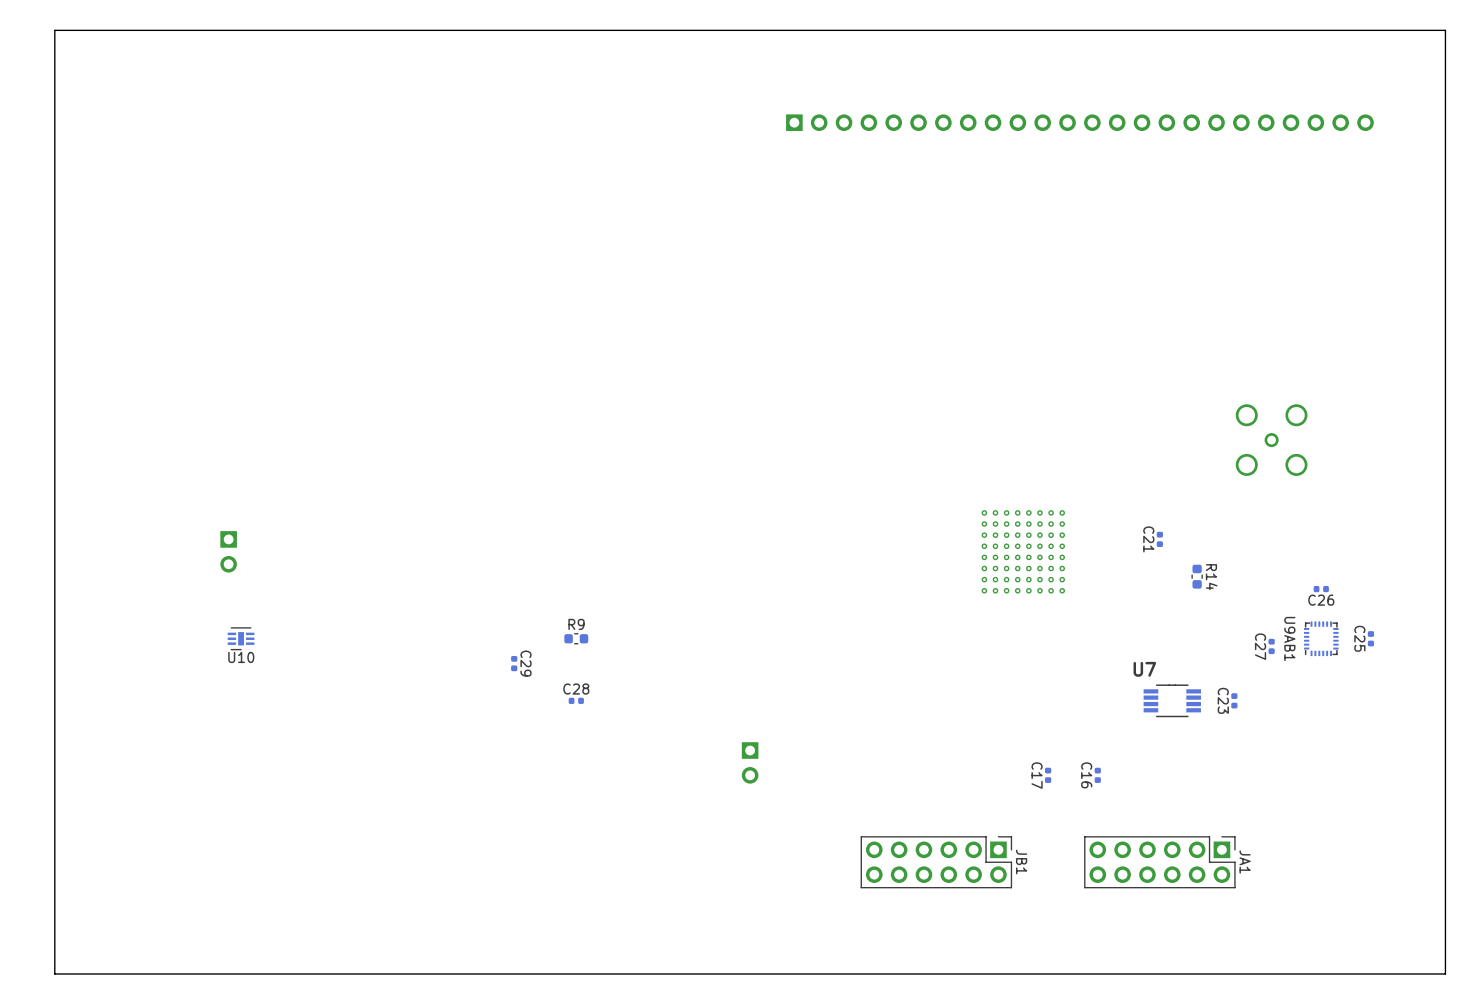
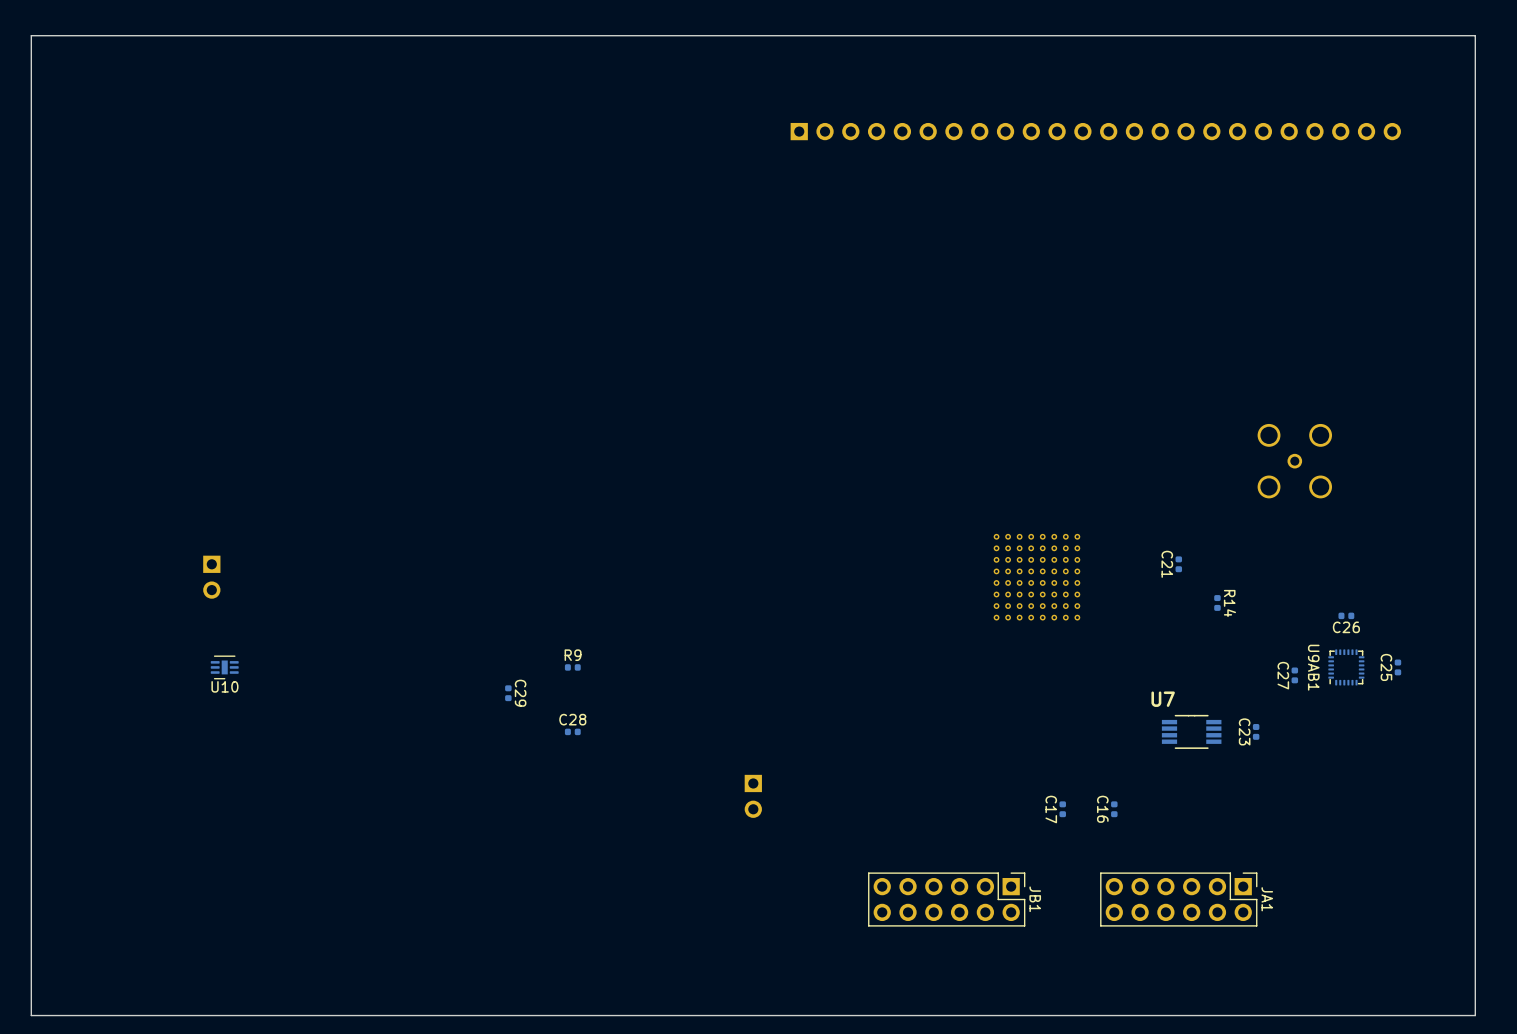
R14 footprint: [1191, 564, 1203, 589] -> [1214, 595, 1221, 611]
R9 footprint: [564, 633, 589, 645] -> [564, 664, 581, 671]

